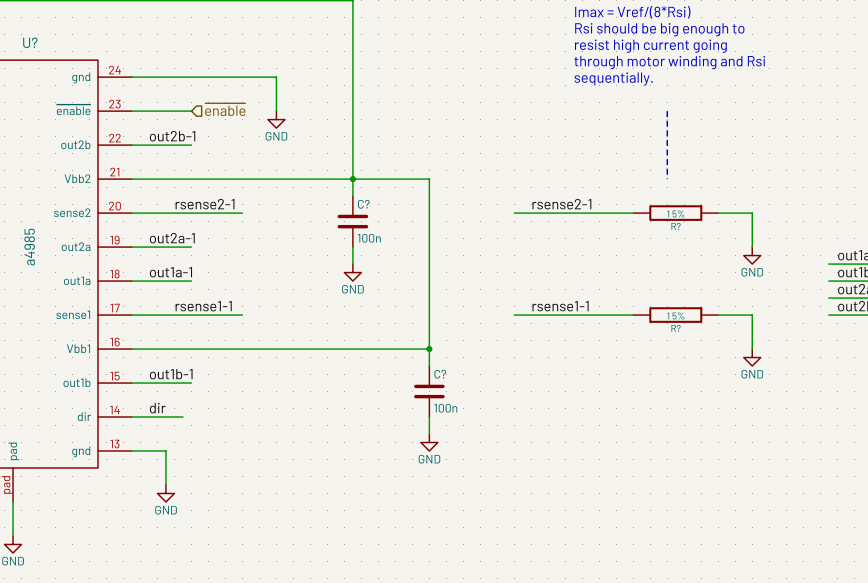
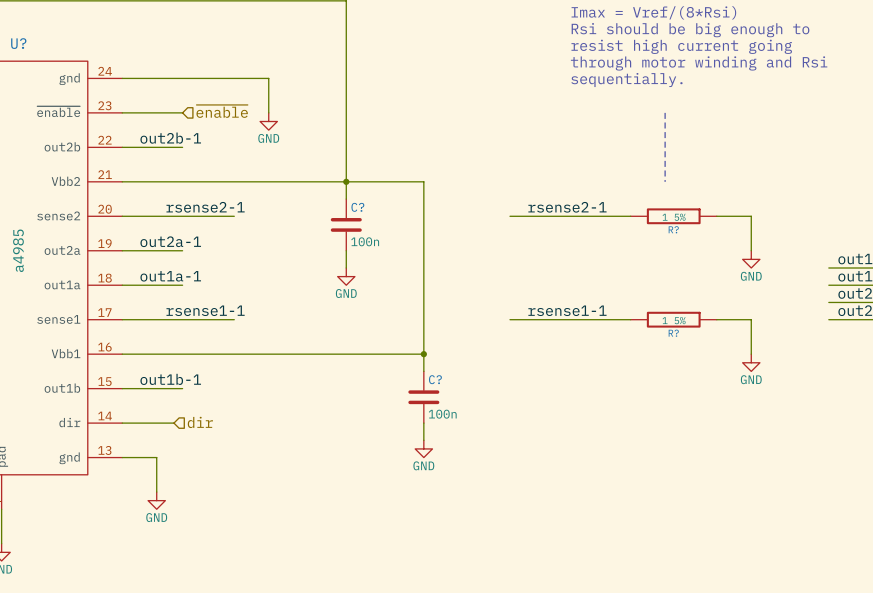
label: dir (157, 408) -> none
hierarchical label: none -> dir (200, 422)

